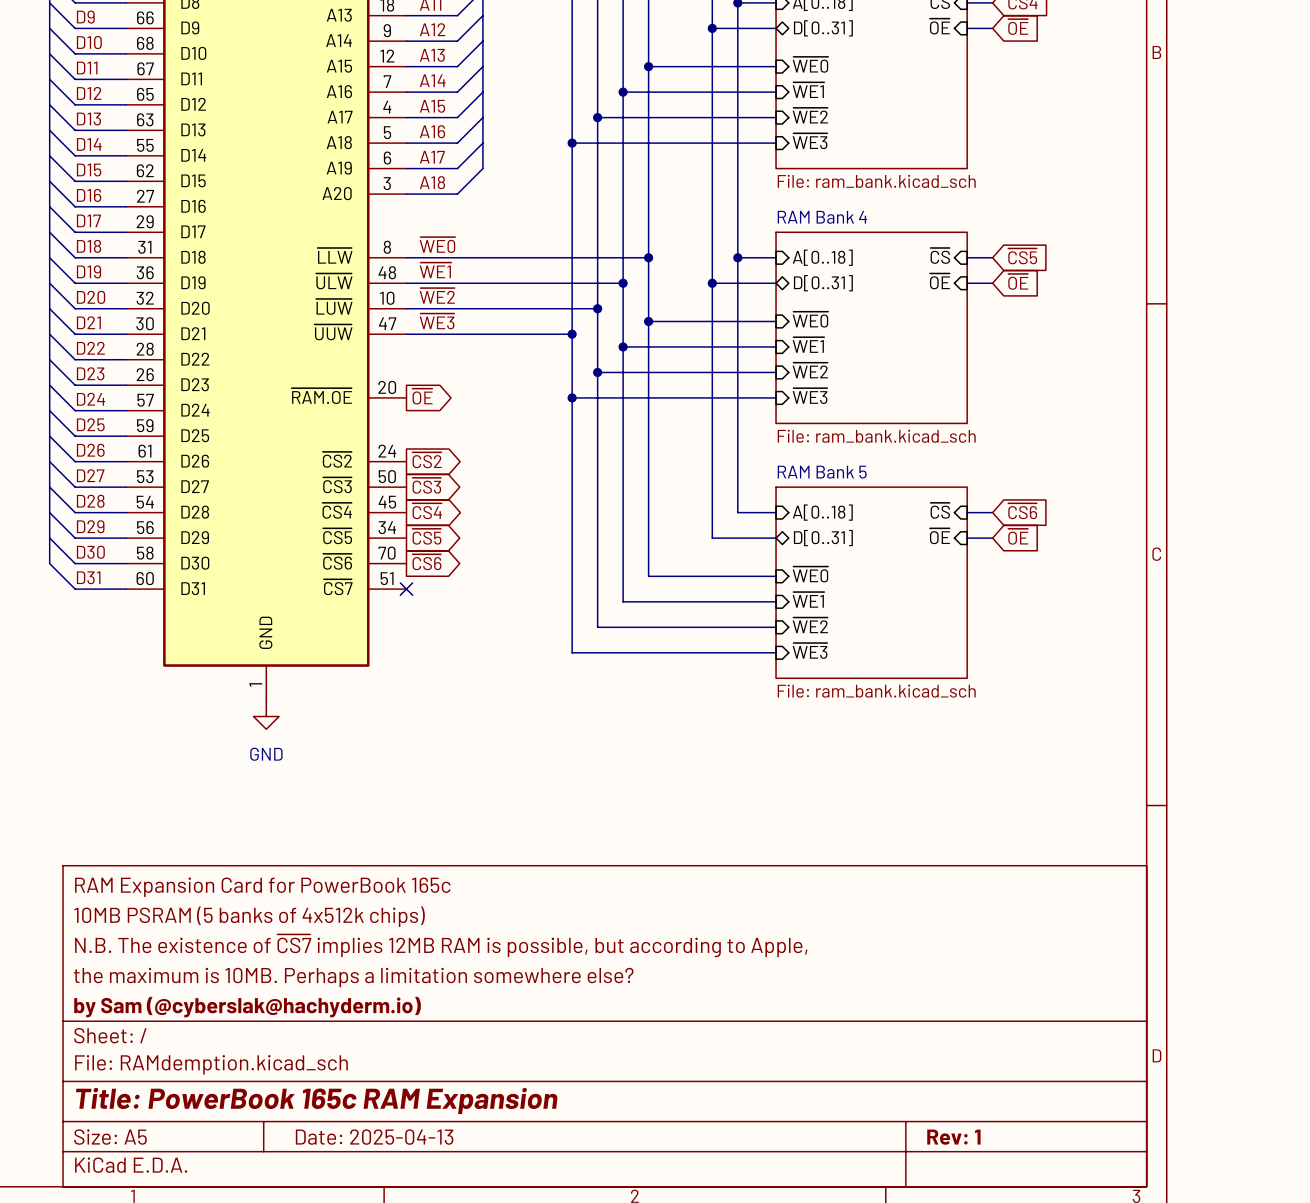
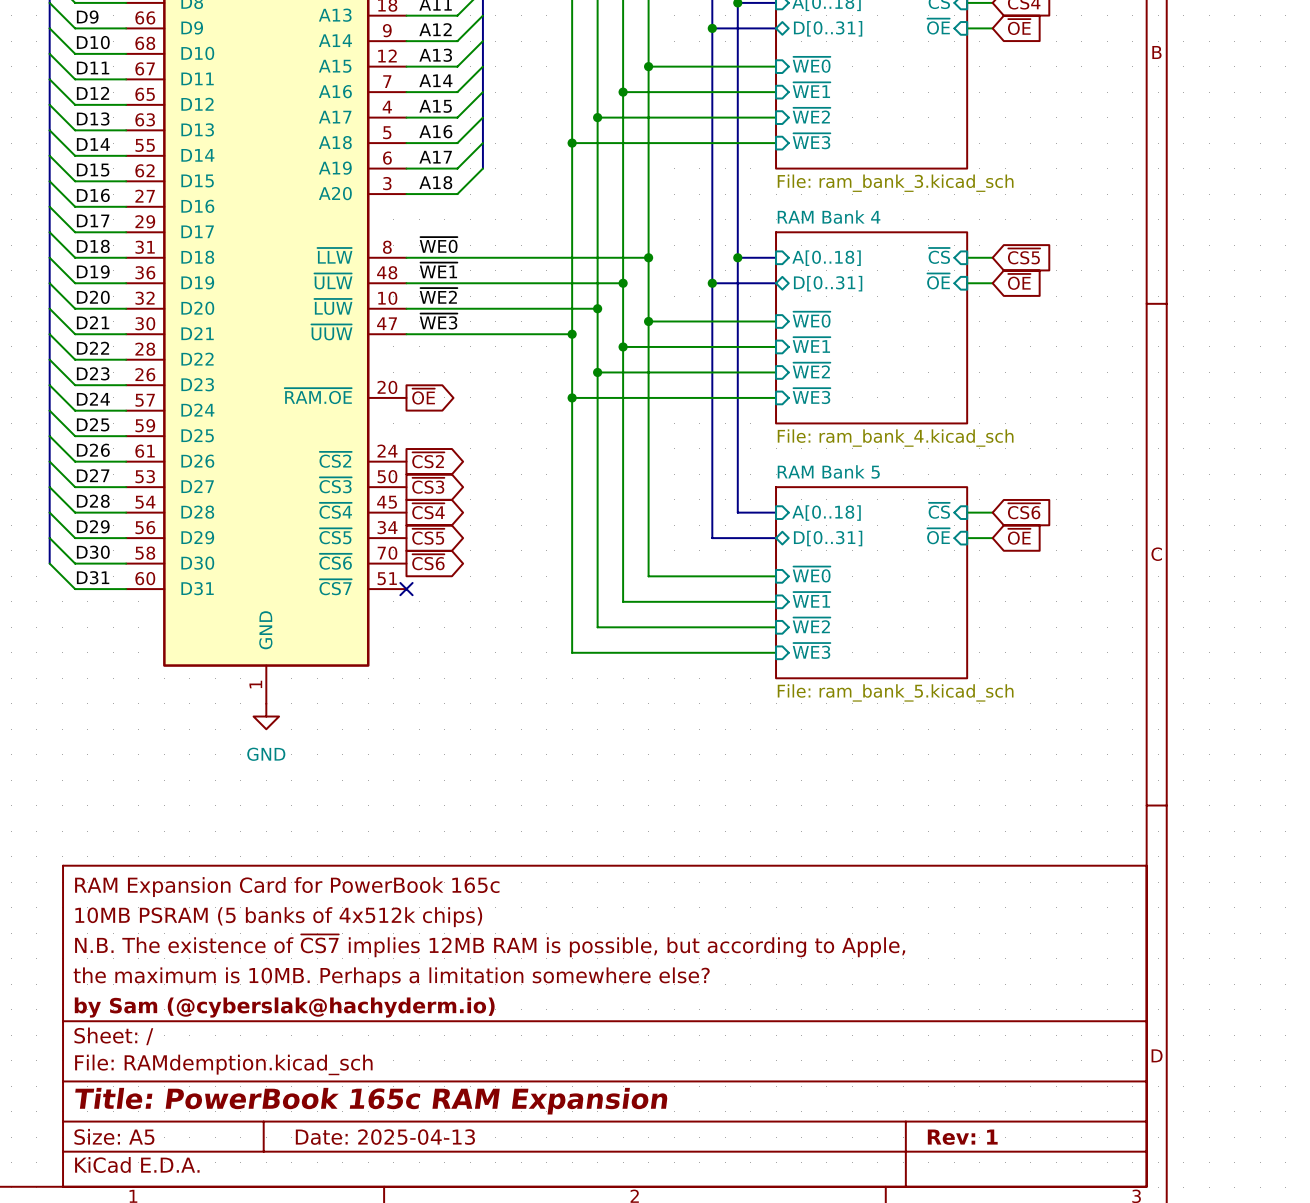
sheet value: File: ram_bank.kicad_sch (876, 181) -> File: ram_bank_3.kicad_sch (895, 183)
sheet RAM Bank 4 value: File: ram_bank.kicad_sch (876, 436) -> File: ram_bank_4.kicad_sch (895, 438)
sheet RAM Bank 5 value: File: ram_bank.kicad_sch (876, 691) -> File: ram_bank_5.kicad_sch (895, 692)

